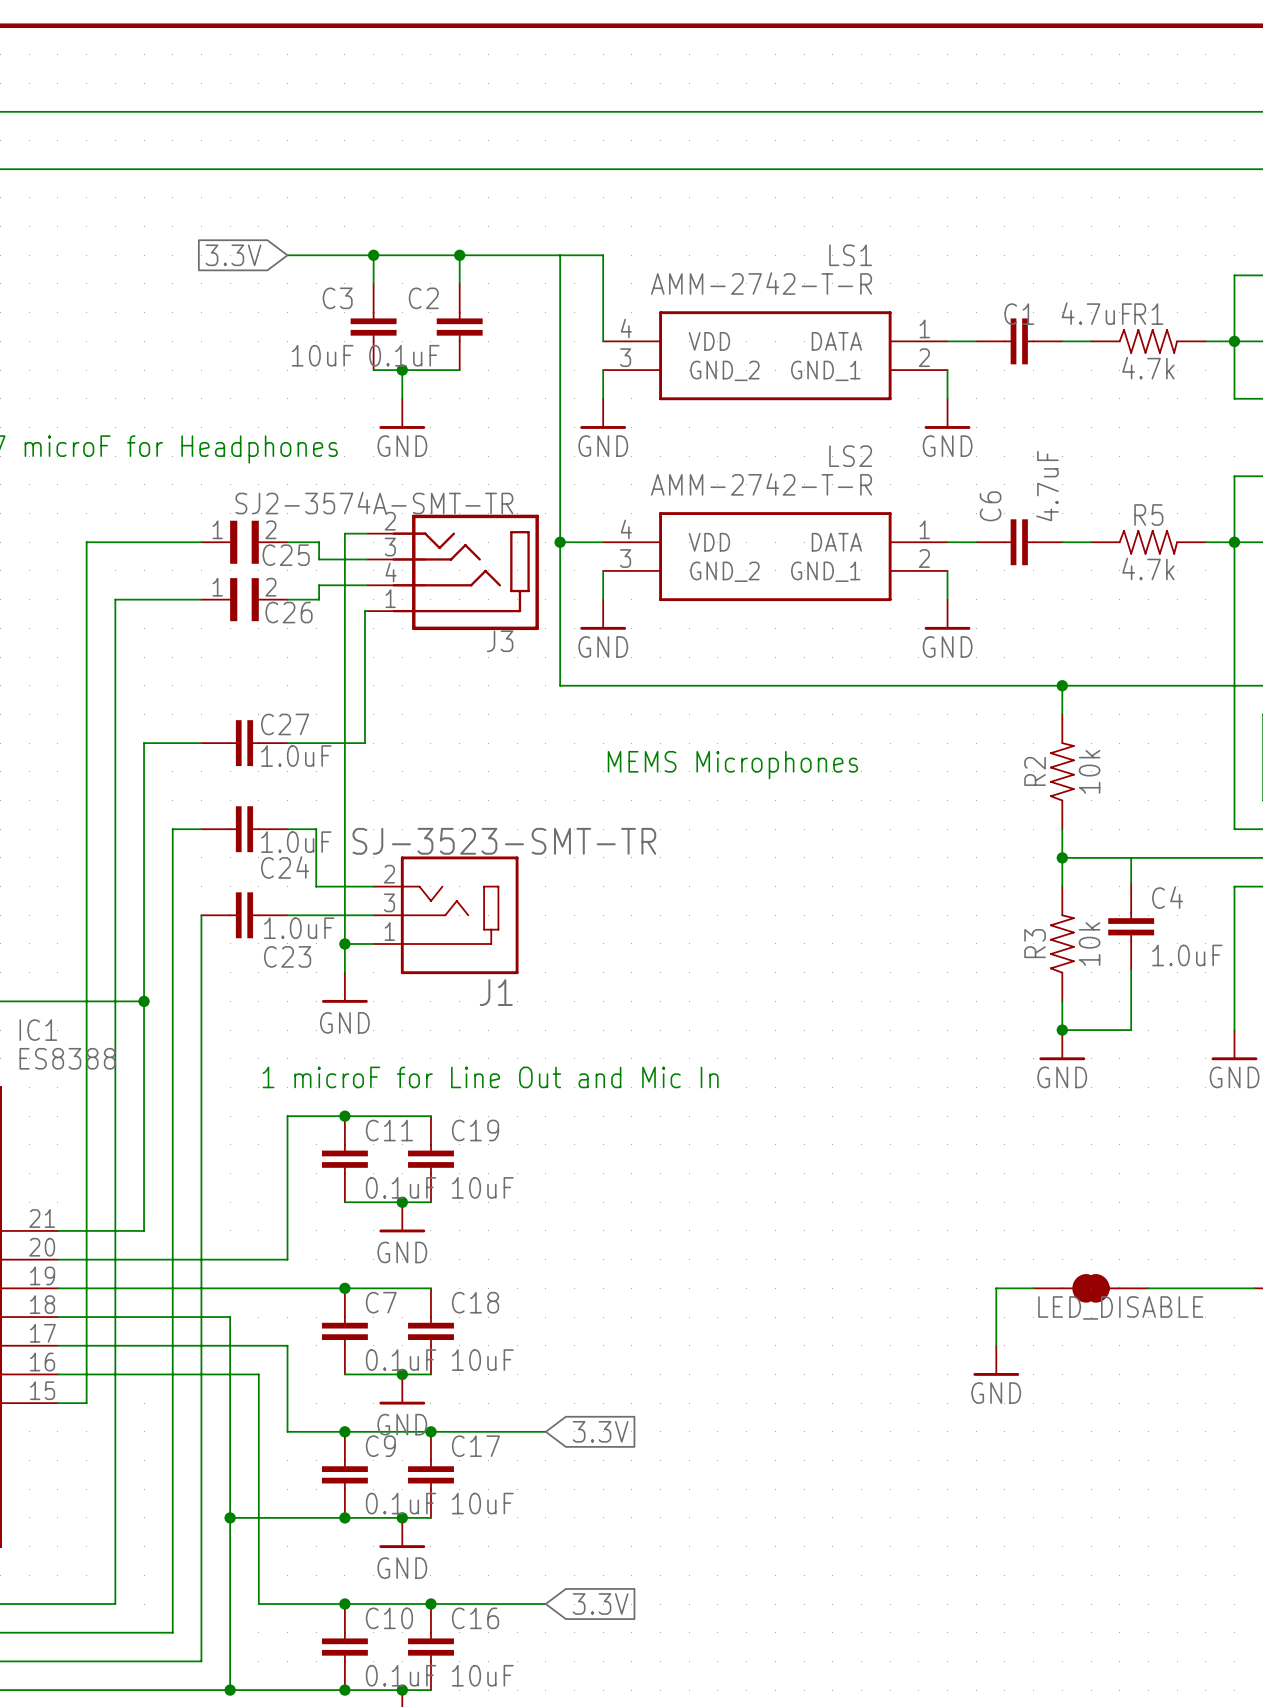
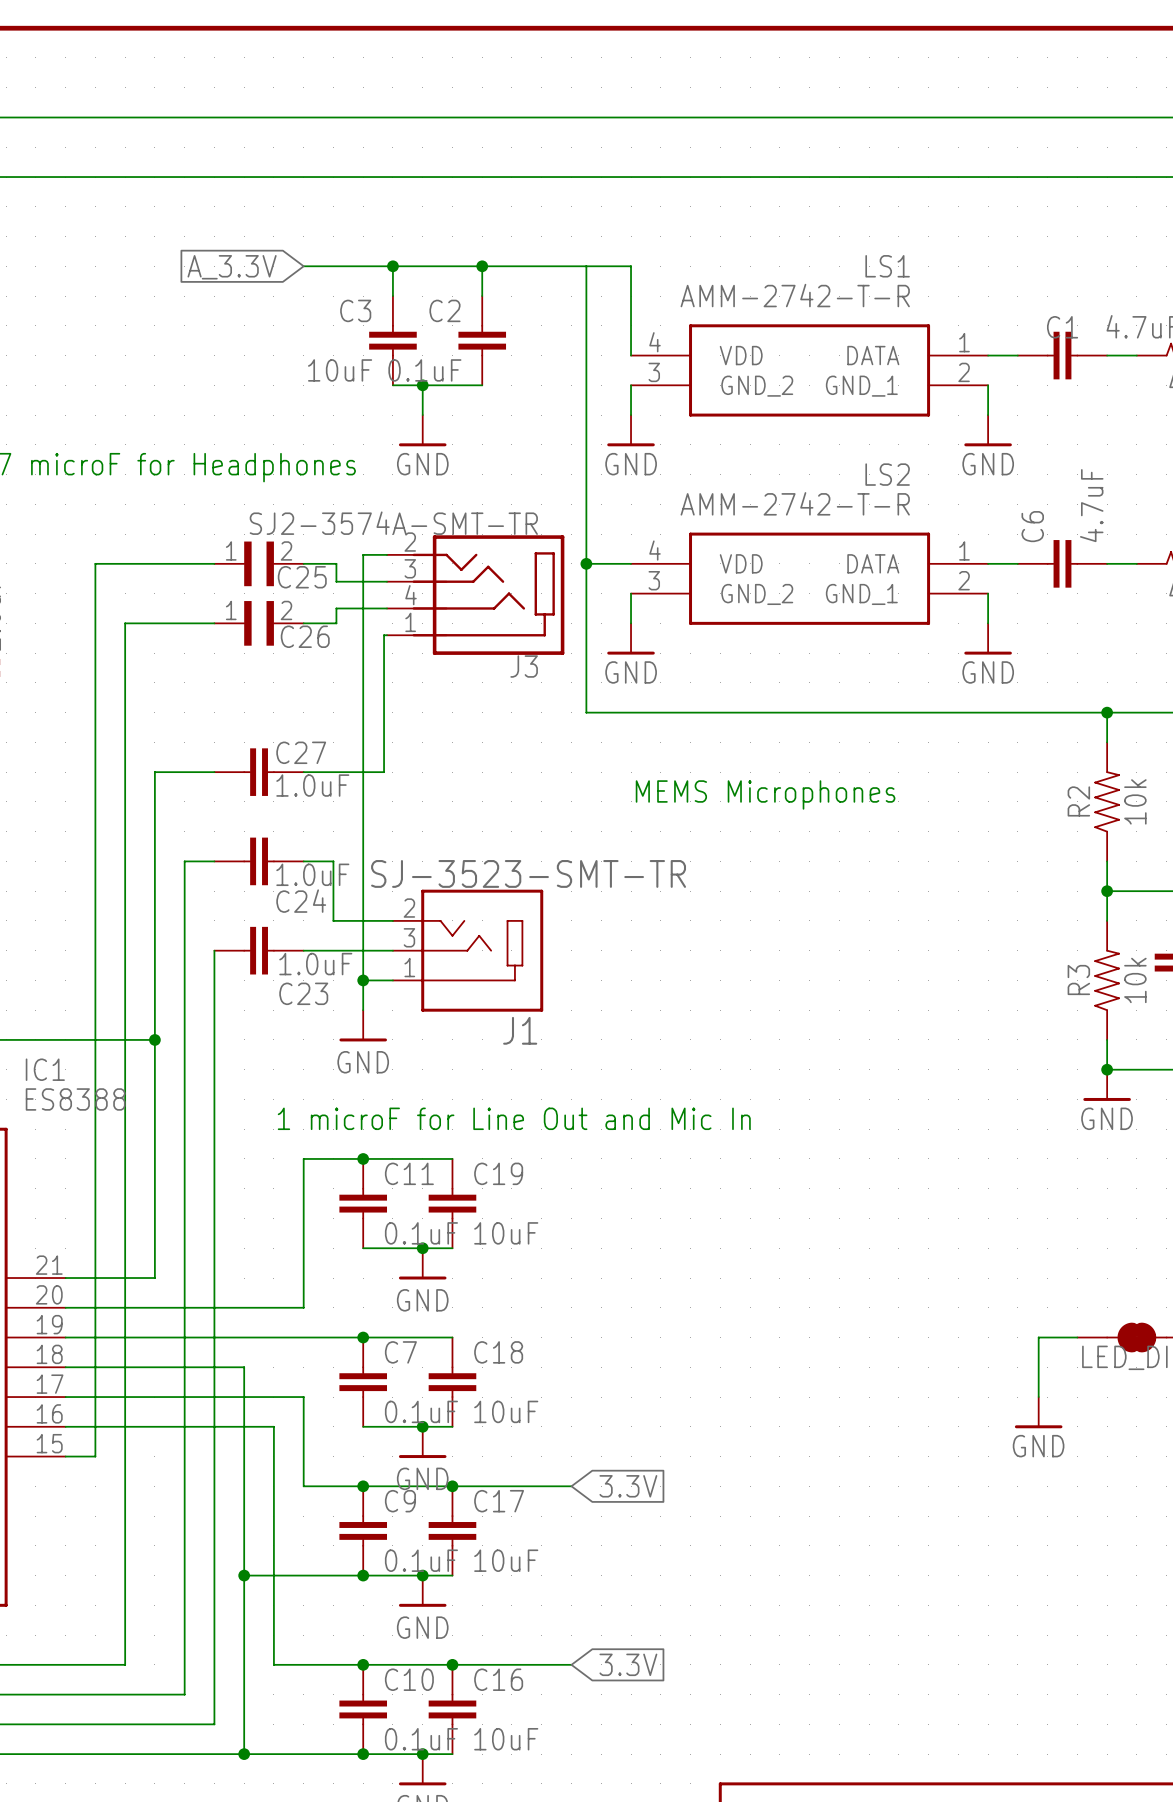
global label: 3.3V (233, 255) -> A_3.3V (232, 267)

